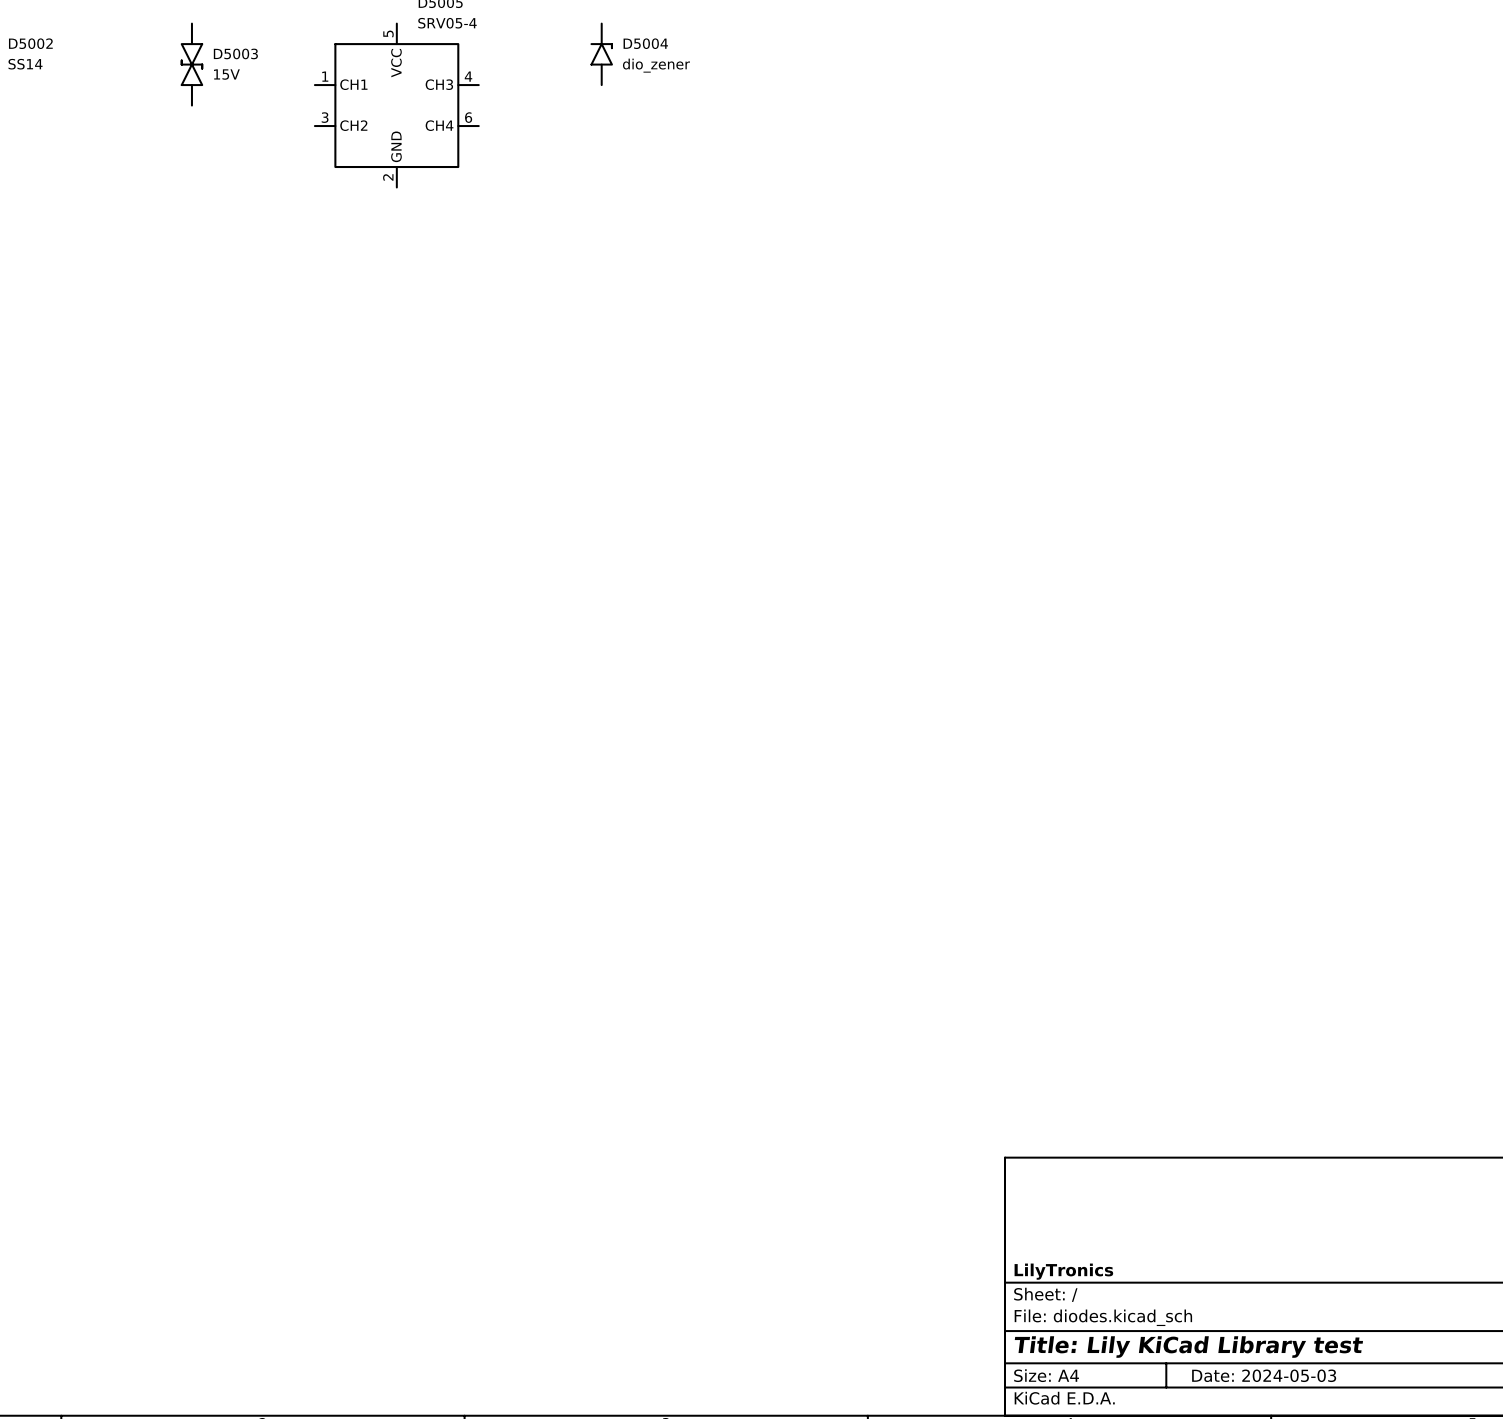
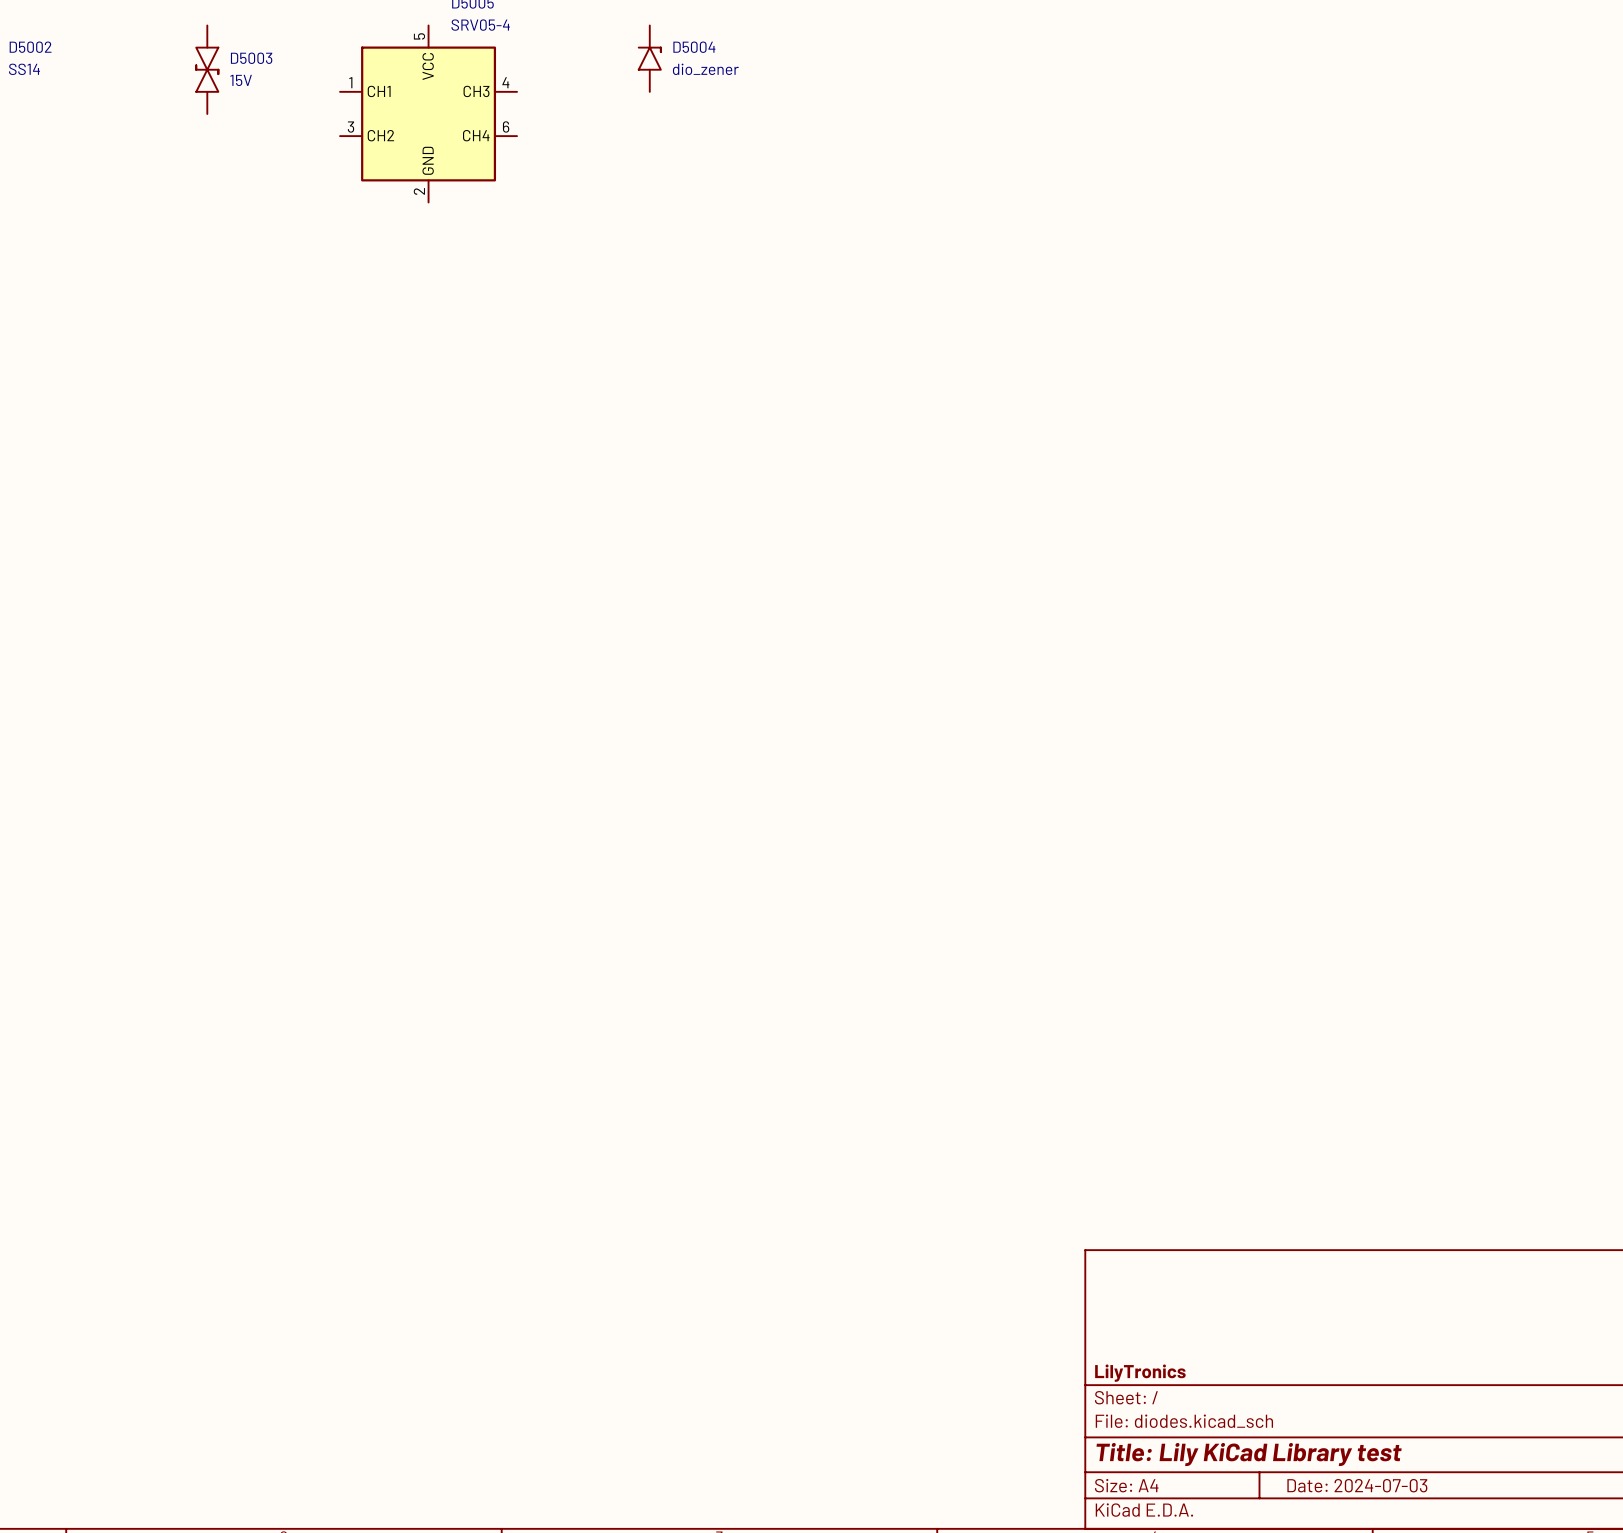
title block: Date: 2024-05-03 (1264, 1375) -> Date: 2024-07-03 (1357, 1485)

